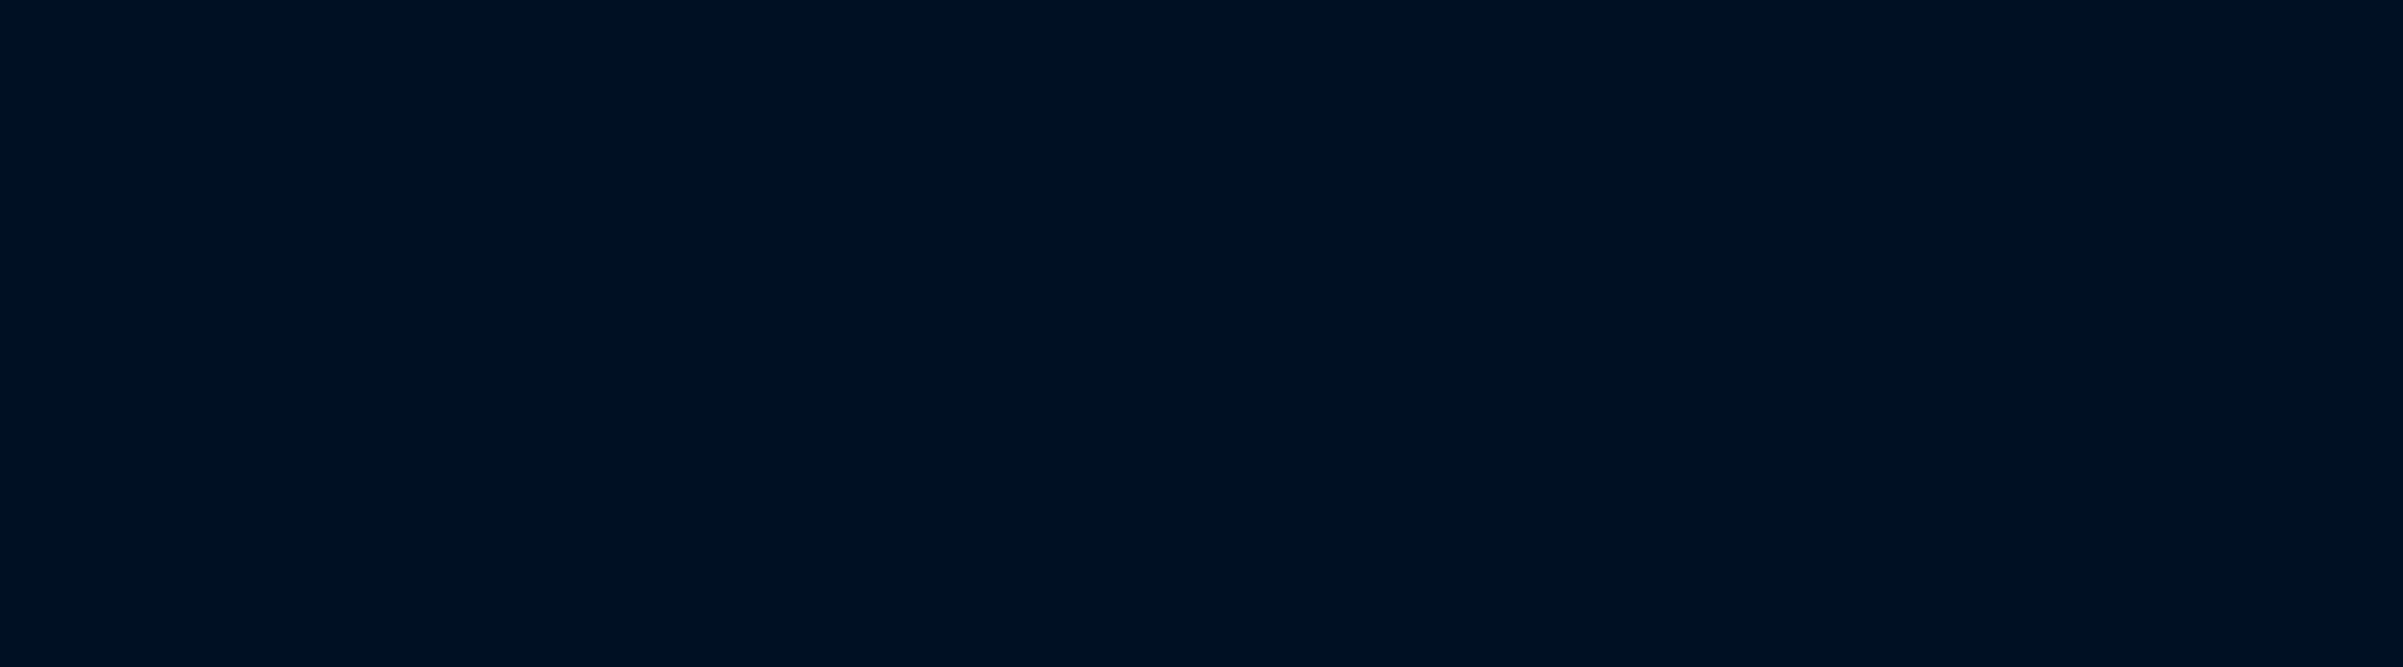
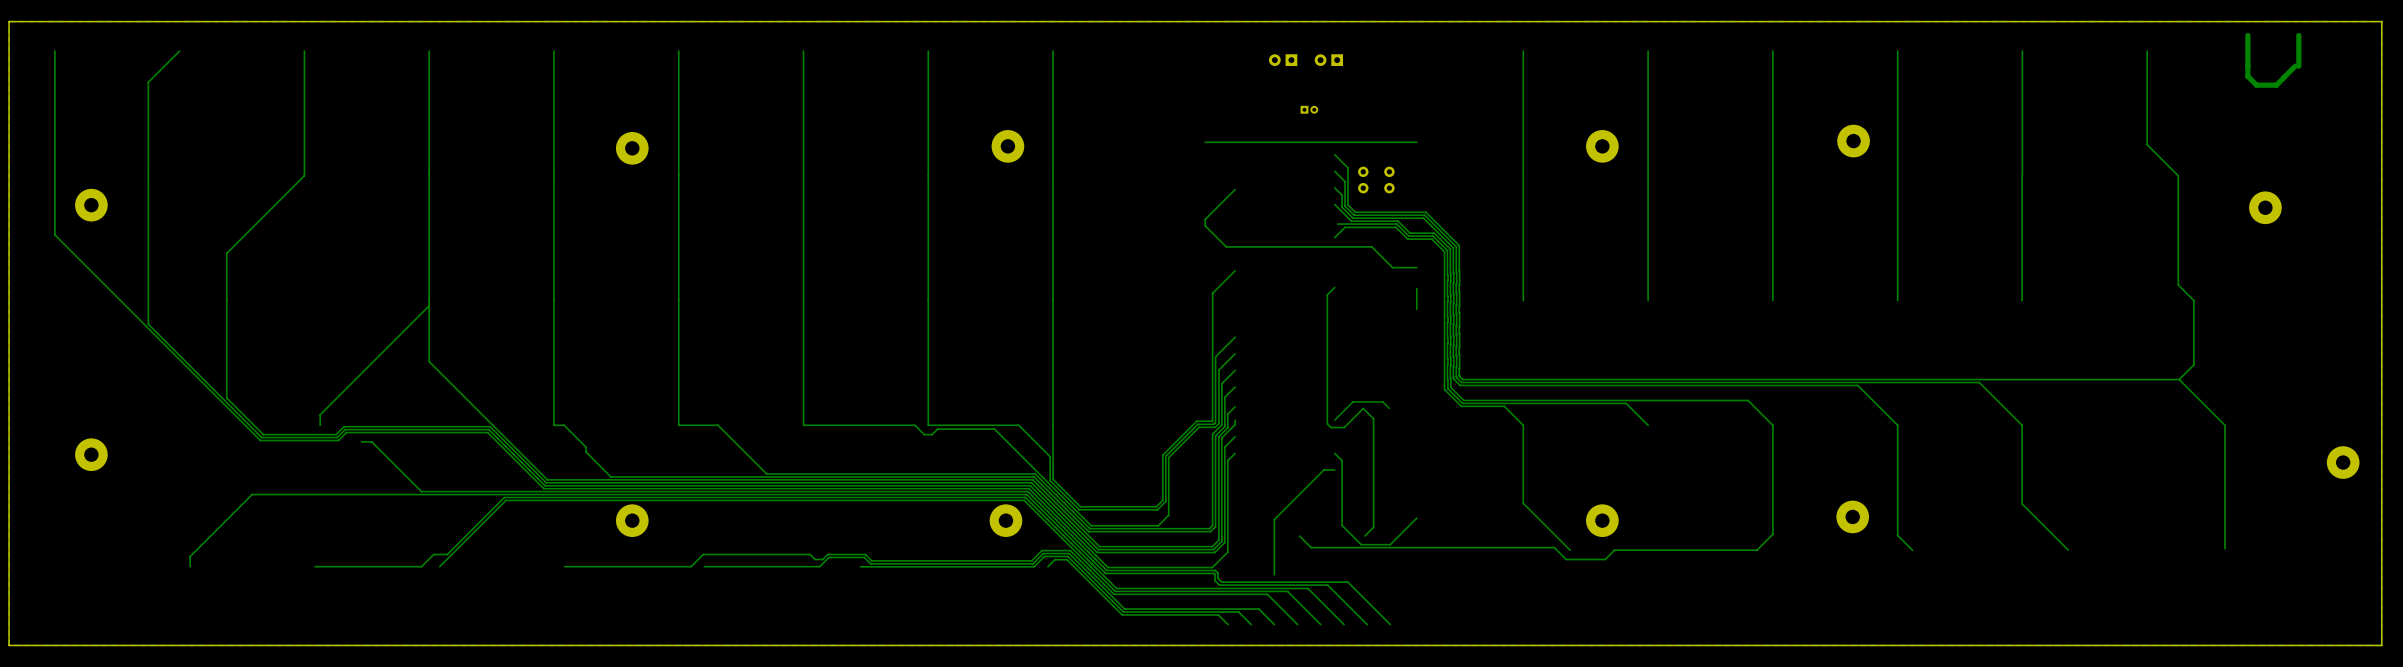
board edge: none -> (2381, 21) (9, 21) (9, 645) (2381, 645) (2381, 21)
track: none -> (2247, 35) (2247, 76) (2256, 85) (2276, 85) (2283, 77)
track: none -> (2298, 35) (2298, 66)
track: none -> (54, 50) (54, 234) (260, 440) (338, 440) (346, 432) (487, 432) (543, 488) (1029, 488) (1108, 567) (1212, 567) (1227, 552) (1227, 460) (1235, 453)
track: none -> (179, 50) (148, 82) (148, 324) (261, 437) (337, 437) (345, 429) (488, 429) (545, 485) (1030, 485) (1097, 552) (1214, 552) (1224, 542) (1224, 447) (1235, 436)
track: none -> (304, 50) (304, 175) (226, 253) (226, 398) (263, 434) (336, 434) (343, 426) (490, 426) (546, 482) (1031, 482) (1098, 549) (1213, 549) (1221, 541) (1221, 437) (1235, 424) (1235, 420)
track: none -> (429, 50) (429, 361) (547, 479) (1032, 479) (1099, 546) (1212, 546) (1218, 540) (1218, 436) (1227, 427) (1227, 414) (1235, 406)
track: none -> (553, 50) (553, 425) (564, 425) (586, 447) (586, 452) (610, 476) (1034, 476) (1088, 531) (1210, 531) (1215, 526) (1215, 435) (1224, 426) (1224, 397) (1235, 386)
track: none -> (678, 50) (678, 425) (718, 425) (766, 474) (1035, 474) (1089, 528) (1209, 528) (1212, 525) (1212, 434) (1221, 424) (1221, 383) (1235, 370)
track: none -> (803, 50) (803, 425) (914, 425) (924, 434) (932, 434) (937, 429) (994, 429) (1091, 525) (1158, 525) (1168, 515) (1168, 457) (1199, 427) (1215, 427) (1218, 423) (1218, 369) (1235, 353)
track: none -> (928, 50) (928, 425) (1018, 425) (1050, 456) (1050, 480) (1079, 509) (1157, 509) (1165, 501) (1165, 456) (1197, 424) (1213, 424) (1215, 422) (1215, 356) (1235, 337)
track: none -> (1053, 50) (1053, 479) (1080, 506) (1156, 506) (1162, 500) (1162, 455) (1196, 421) (1212, 421) (1212, 293) (1235, 270)
track: none -> (1523, 50) (1523, 300)
track: none -> (1648, 50) (1648, 300)
track: none -> (1772, 50) (1772, 300)
track: none -> (1897, 50) (1897, 300)
track: none -> (2022, 50) (2022, 175)
track: none -> (2147, 50) (2147, 144) (2178, 175) (2178, 284) (2193, 300) (2193, 364) (2179, 379)
part: none -> (1283, 60)
part: none -> (1328, 60)
track: none -> (2295, 66) (2283, 77)
part: none -> (1309, 109)
part: none -> (1853, 141)
track: none -> (1416, 142) (1205, 142)
part: none -> (1007, 146)
part: none -> (1602, 146)
part: none -> (632, 148)
track: none -> (1334, 154) (1347, 167) (1347, 204) (1355, 212) (1425, 212) (1459, 245) (1459, 375) (1462, 379) (2179, 379)
track: none -> (1334, 171) (1344, 181) (1344, 206) (1354, 215) (1424, 215) (1456, 246) (1456, 376) (1461, 382) (1979, 382) (2022, 425) (2022, 503) (2068, 550)
track: none -> (2022, 175) (2022, 300)
part: none -> (1363, 180)
part: none -> (1389, 180)
track: none -> (1334, 187) (1342, 195) (1342, 207) (1352, 218) (1423, 218) (1453, 247) (1453, 377) (1460, 385) (1857, 385) (1897, 425) (1897, 535) (1912, 550)
track: none -> (1235, 189) (1205, 219) (1205, 225) (1226, 246) (1371, 246) (1392, 267) (1416, 267)
track: none -> (1334, 204) (1351, 221) (1398, 221) (1410, 233) (1434, 233) (1450, 249) (1450, 387) (1463, 400) (1748, 400) (1772, 425) (1772, 534) (1756, 550) (1614, 550) (1605, 559) (1566, 559) (1554, 547) (1311, 547) (1299, 536)
part: none -> (91, 205)
part: none -> (2265, 207)
track: none -> (1337, 224) (1396, 224) (1408, 236) (1433, 236) (1447, 250) (1447, 388) (1462, 403) (1626, 403) (1648, 425)
track: none -> (1334, 237) (1344, 227) (1395, 227) (1407, 239) (1431, 239) (1444, 251) (1444, 389) (1461, 406) (1504, 406) (1523, 425) (1523, 503) (1570, 550)
track: none -> (1334, 287) (1327, 294) (1327, 423) (1331, 427) (1344, 427) (1363, 408) (1373, 418) (1373, 527) (1364, 536)
track: none -> (1416, 288) (1416, 309)
track: none -> (429, 305) (320, 414) (320, 425)
track: none -> (2179, 379) (2224, 425) (2224, 548)
track: none -> (1389, 408) (1382, 401) (1352, 401) (1334, 420)
track: none -> (361, 441) (371, 441) (421, 491) (1027, 491) (1106, 570) (1215, 570) (1217, 573) (1217, 578) (1221, 582) (1347, 582) (1390, 624)
track: none -> (1334, 453) (1342, 460) (1342, 525) (1361, 544) (1390, 544) (1416, 518)
part: none -> (91, 454)
part: none -> (2343, 462)
track: none -> (1334, 469) (1324, 469) (1274, 519) (1274, 574)
part: none -> (1852, 516)
part: none -> (632, 520)
part: none -> (1005, 520)
part: none -> (1602, 520)
track: none -> (190, 566) (190, 556) (252, 494) (1026, 494) (1105, 573) (1214, 573) (1215, 580) (1219, 585) (1327, 585) (1367, 624)
track: none -> (314, 566) (421, 566) (433, 554) (447, 554) (504, 497) (1025, 497) (1116, 588) (1307, 588) (1344, 624)
track: none -> (439, 566) (505, 500) (1024, 500) (1115, 591) (1287, 591) (1320, 624)
track: none -> (564, 566) (691, 566) (703, 554) (810, 554) (815, 559) (822, 559) (827, 554) (865, 554) (871, 560) (1031, 560) (1042, 550) (1070, 550) (1114, 594) (1267, 594) (1297, 624)
track: none -> (704, 566) (819, 566) (828, 557) (864, 557) (870, 563) (1032, 563) (1043, 553) (1069, 553) (1124, 609) (1258, 609) (1274, 624)
track: none -> (860, 566) (1034, 566) (1044, 556) (1067, 556) (1123, 611) (1238, 611) (1251, 624)
track: none -> (1047, 566) (1054, 559) (1066, 559) (1122, 614) (1218, 614) (1228, 624)

